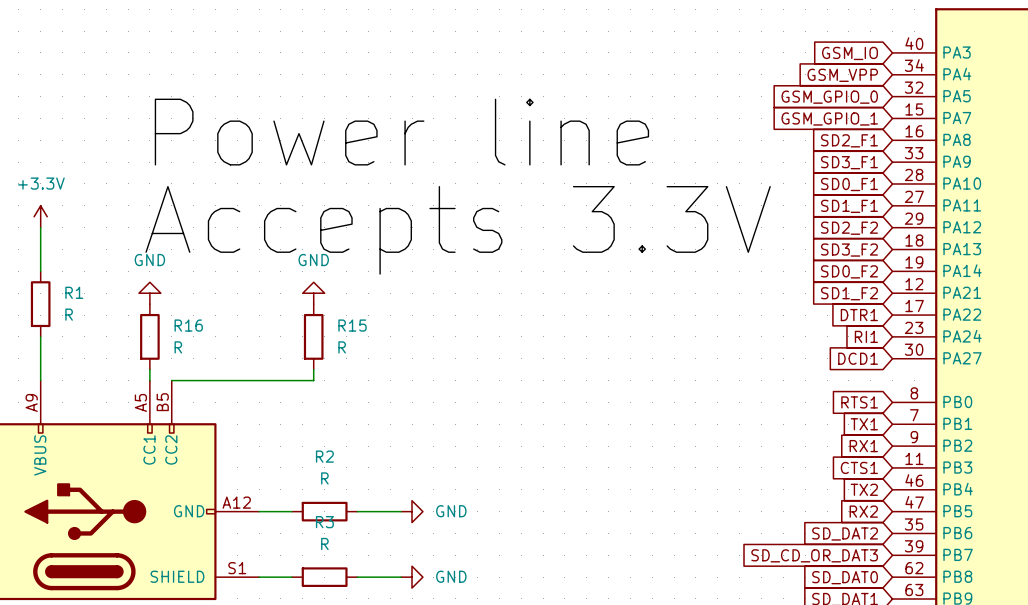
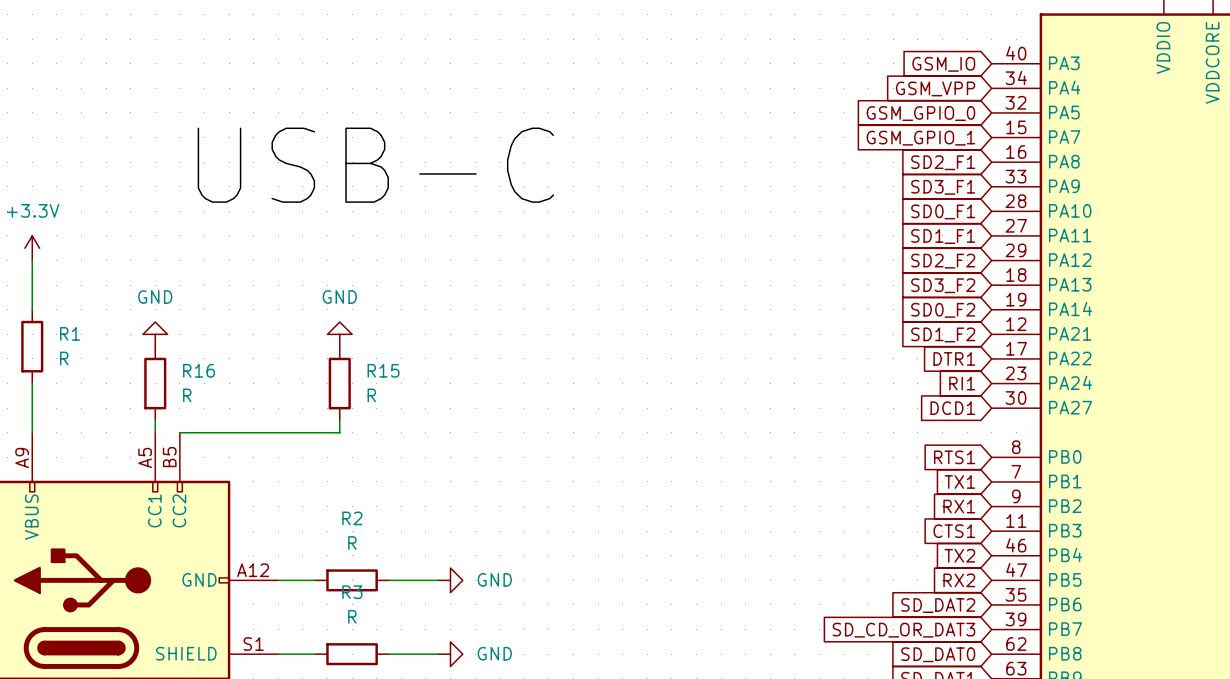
label: Power line (401, 132) -> none
label: none -> USB-C (375, 165)
label: Accepts 3.3V (458, 230) -> none

